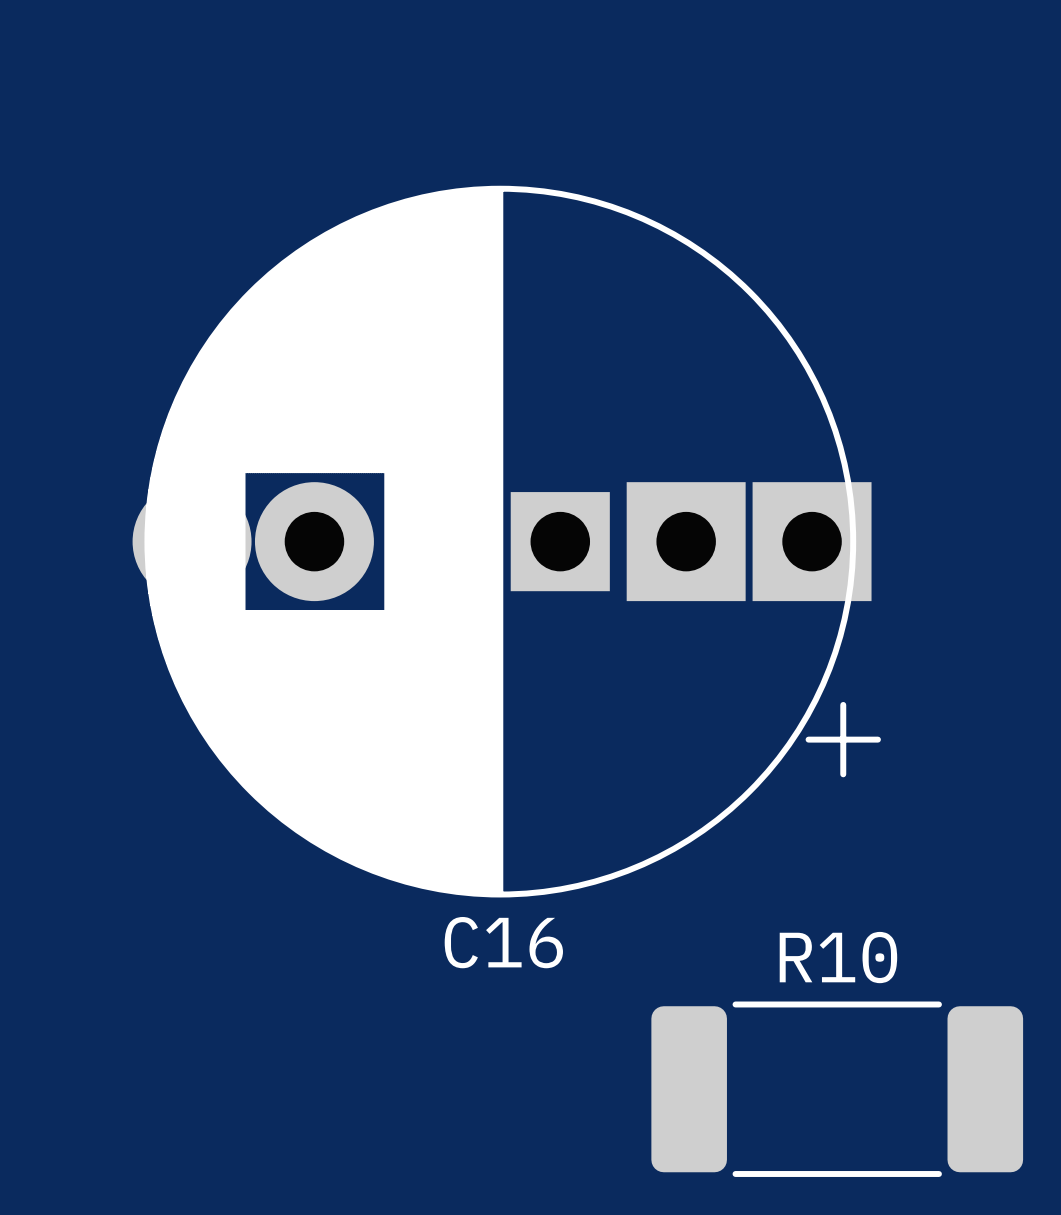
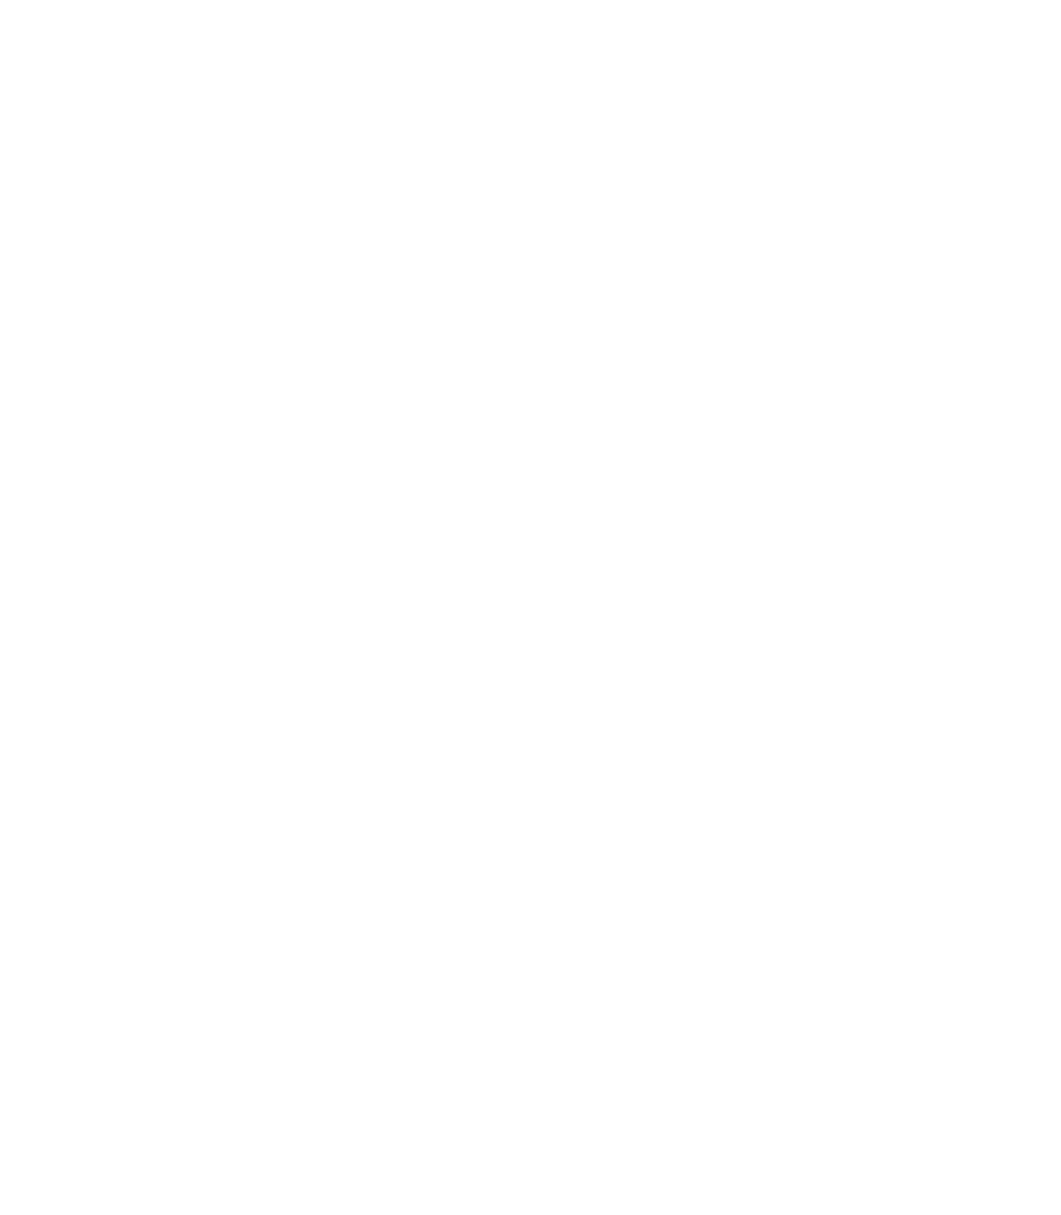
C16: (506, 541) -> none
R10: (837, 1089) -> none

